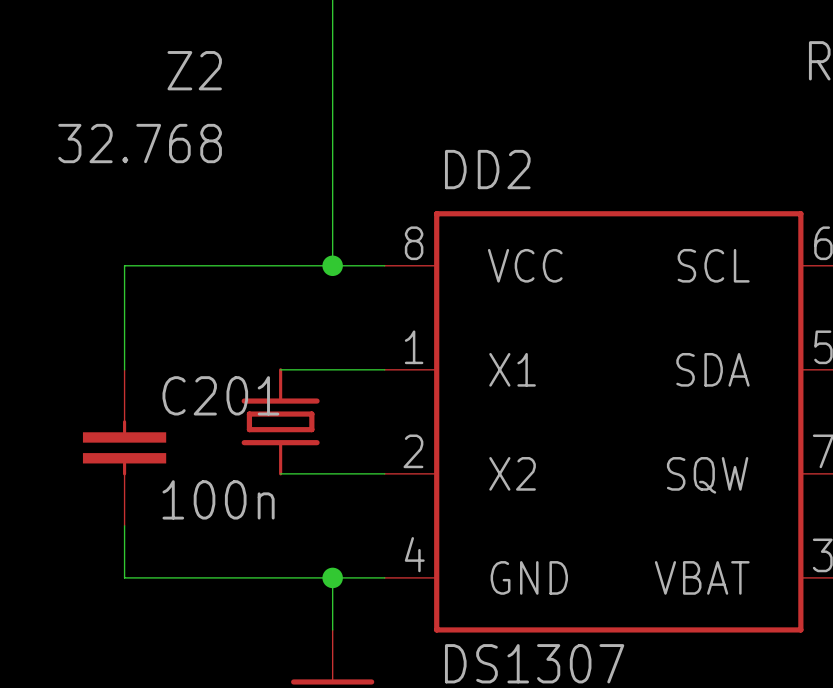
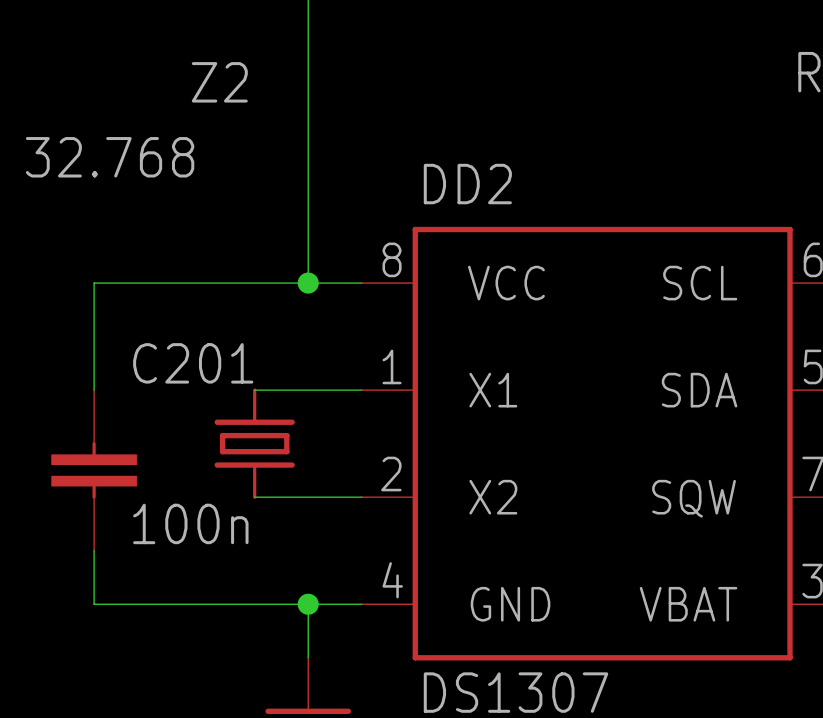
Z2 name position: Z2 (194, 70) -> Z2 (219, 82)
C201 name position: C201 (220, 395) -> C201 (193, 363)

